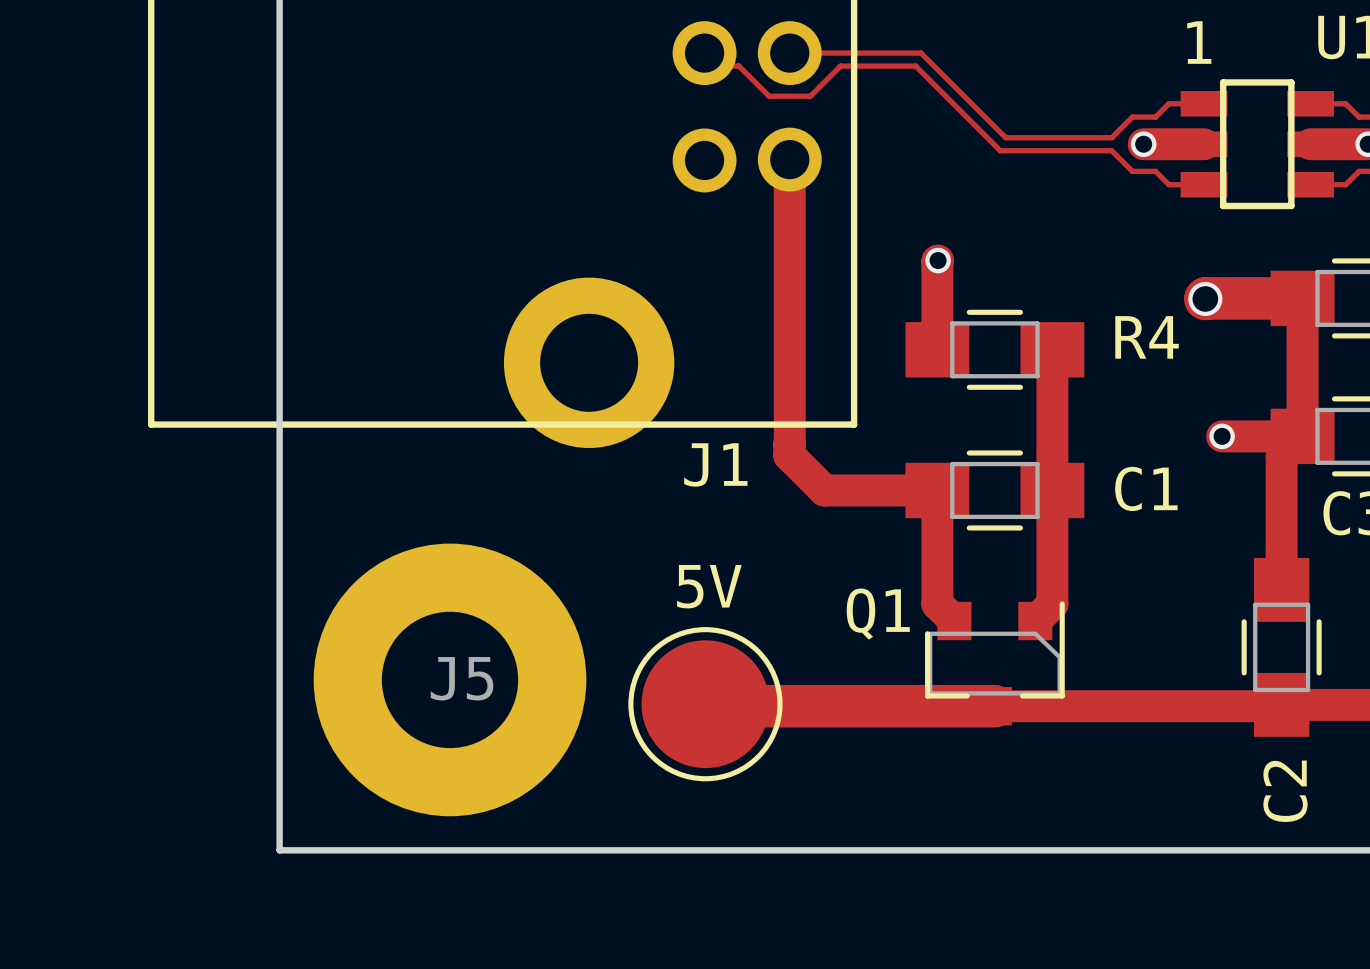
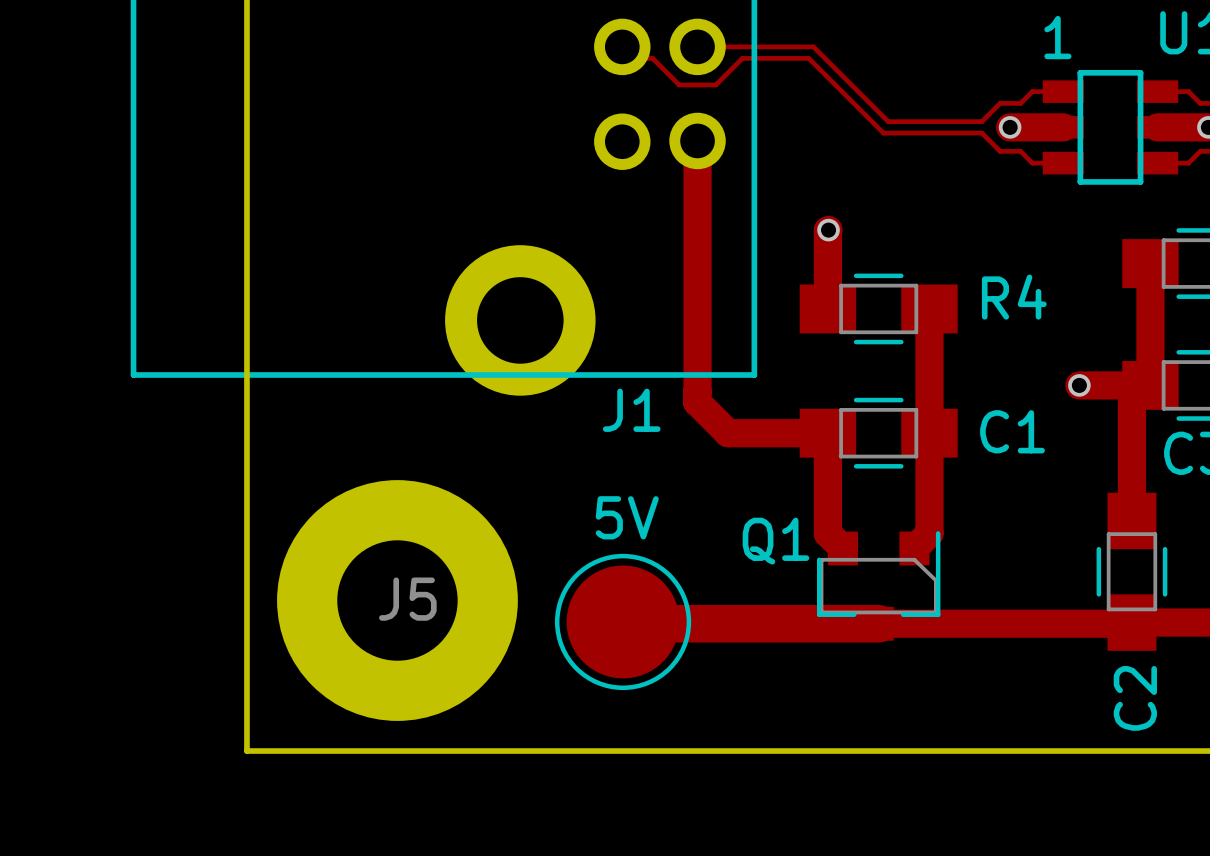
track: (1205, 298) (1302, 298) -> none
via: (1205, 298) -> none

